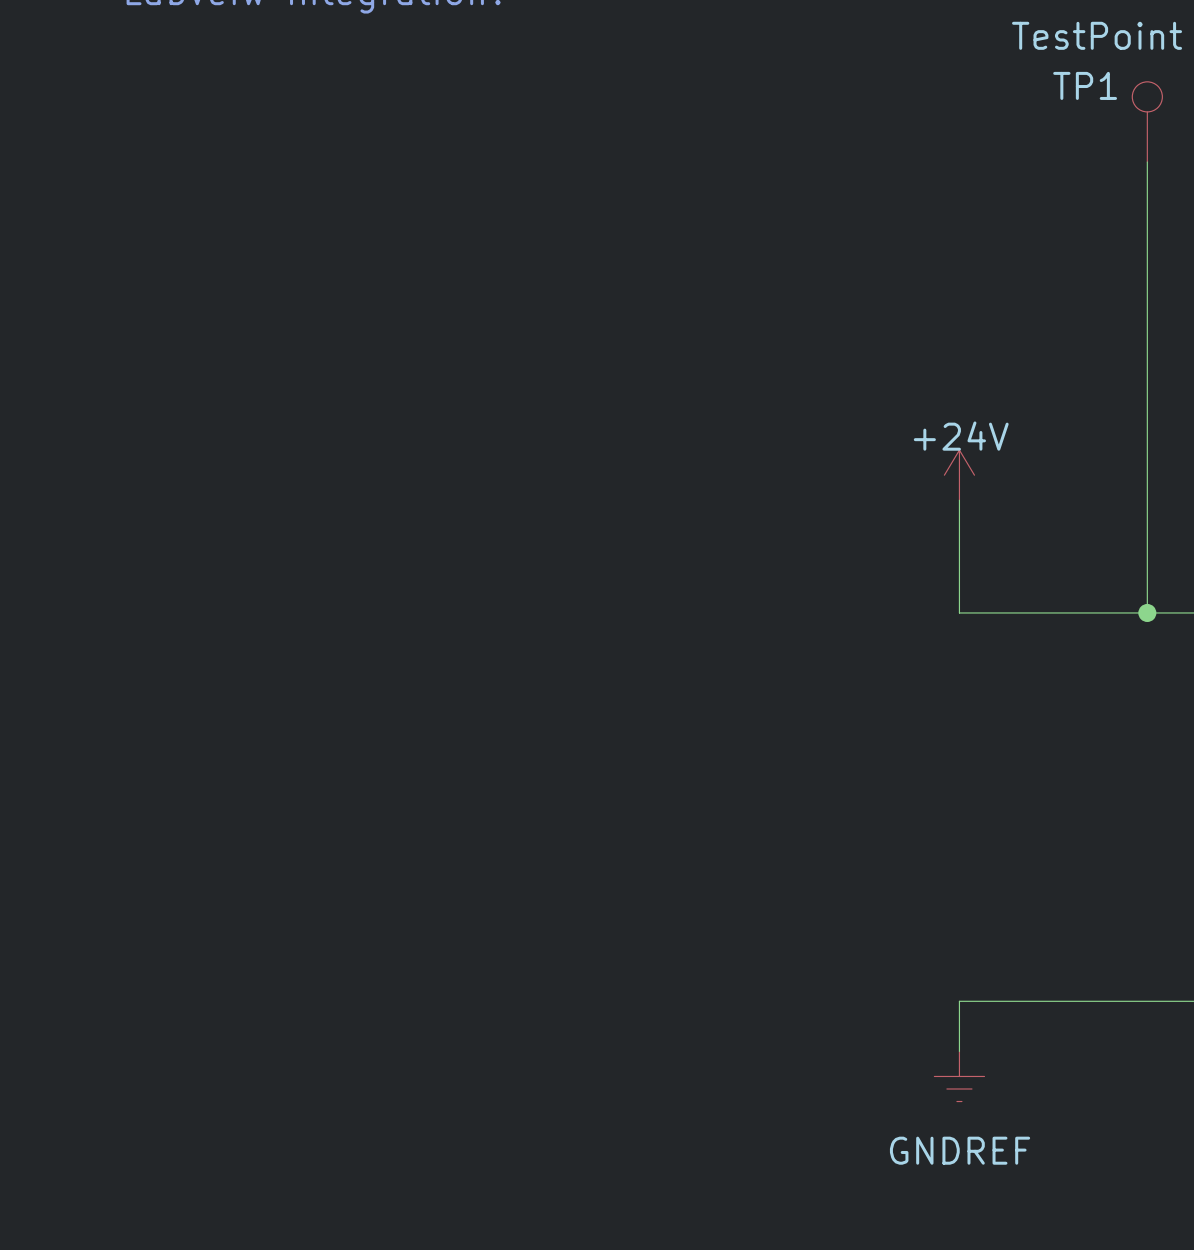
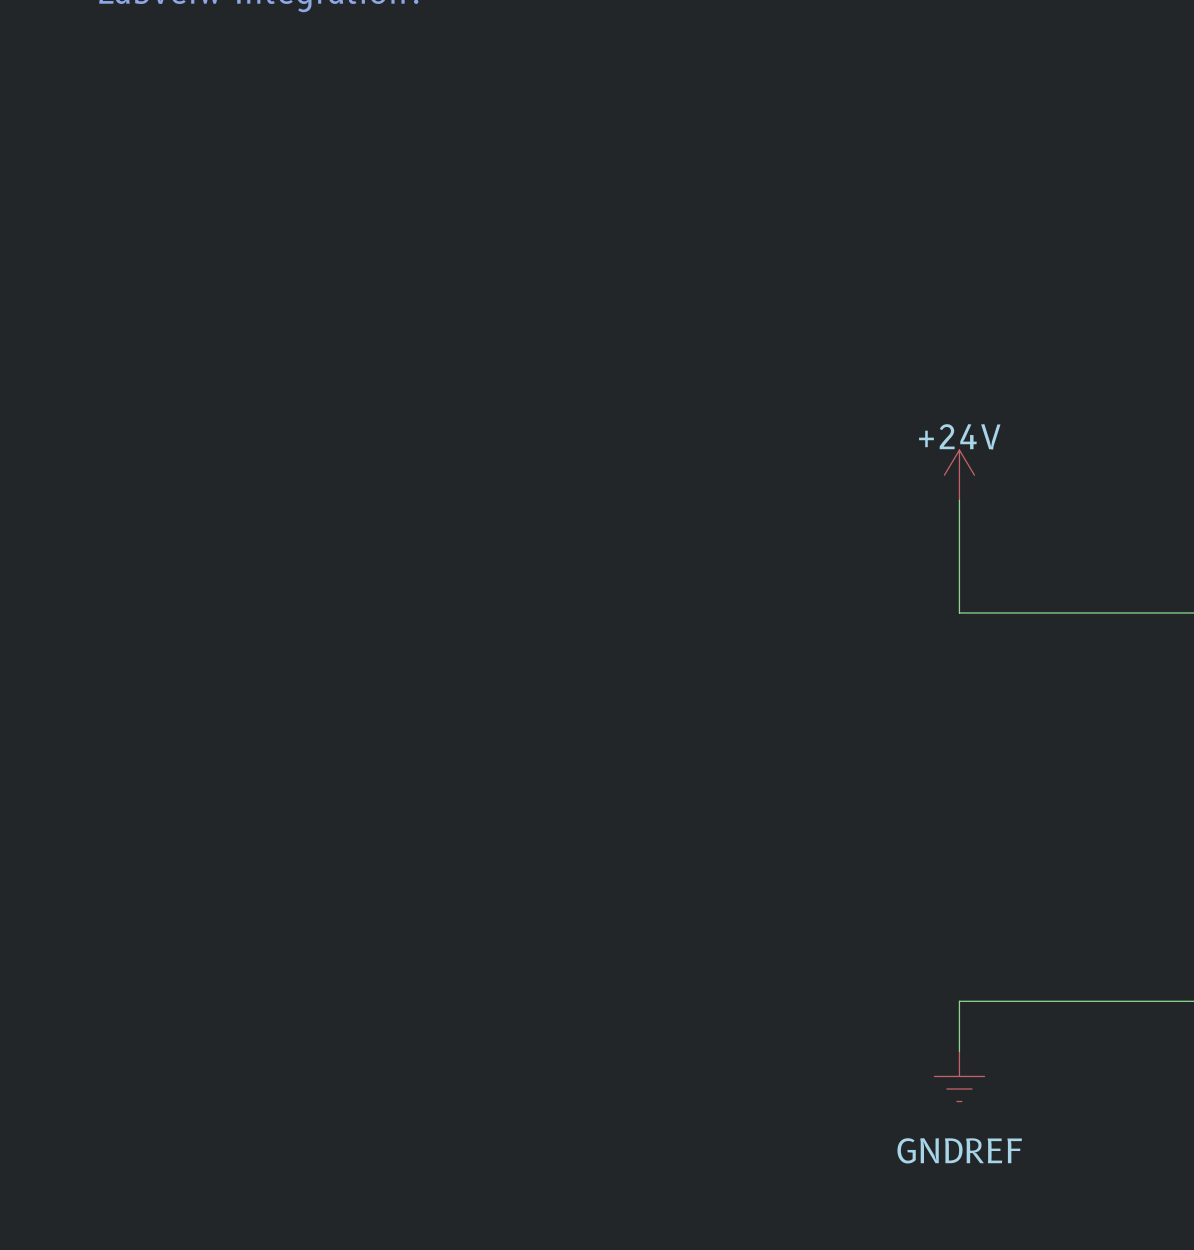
TP1: TestPoint (1147, 121) -> none
wire: (1147, 162) (1147, 612) -> none
junction: (1147, 612) -> none

